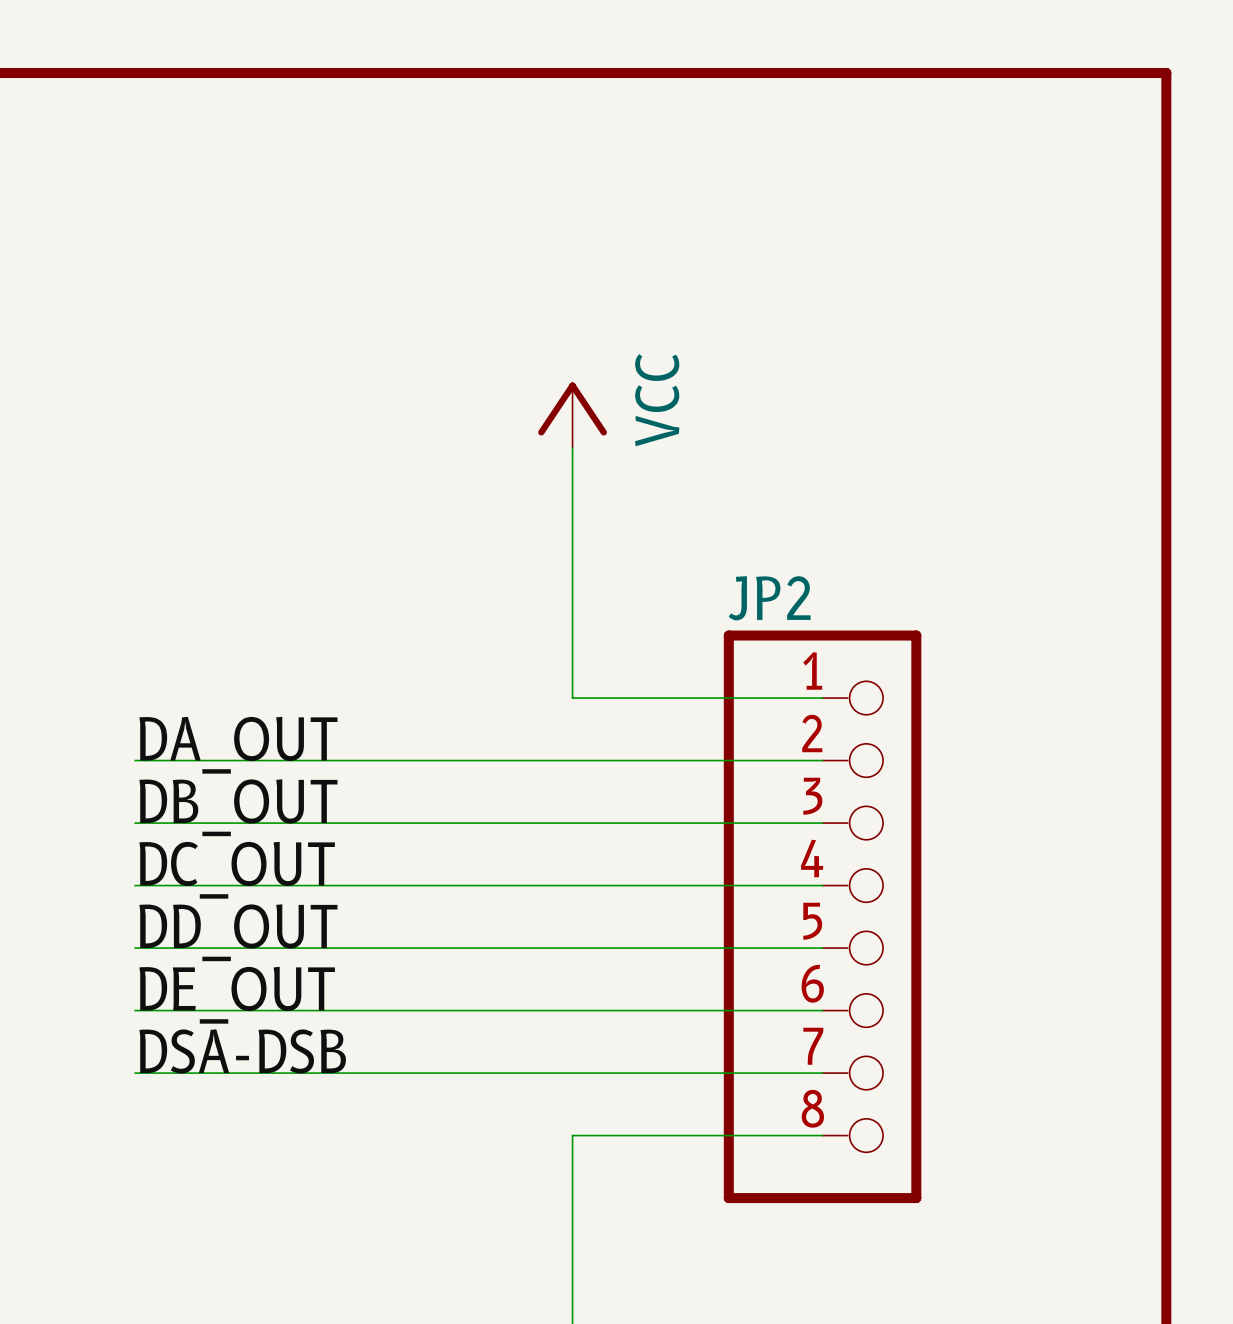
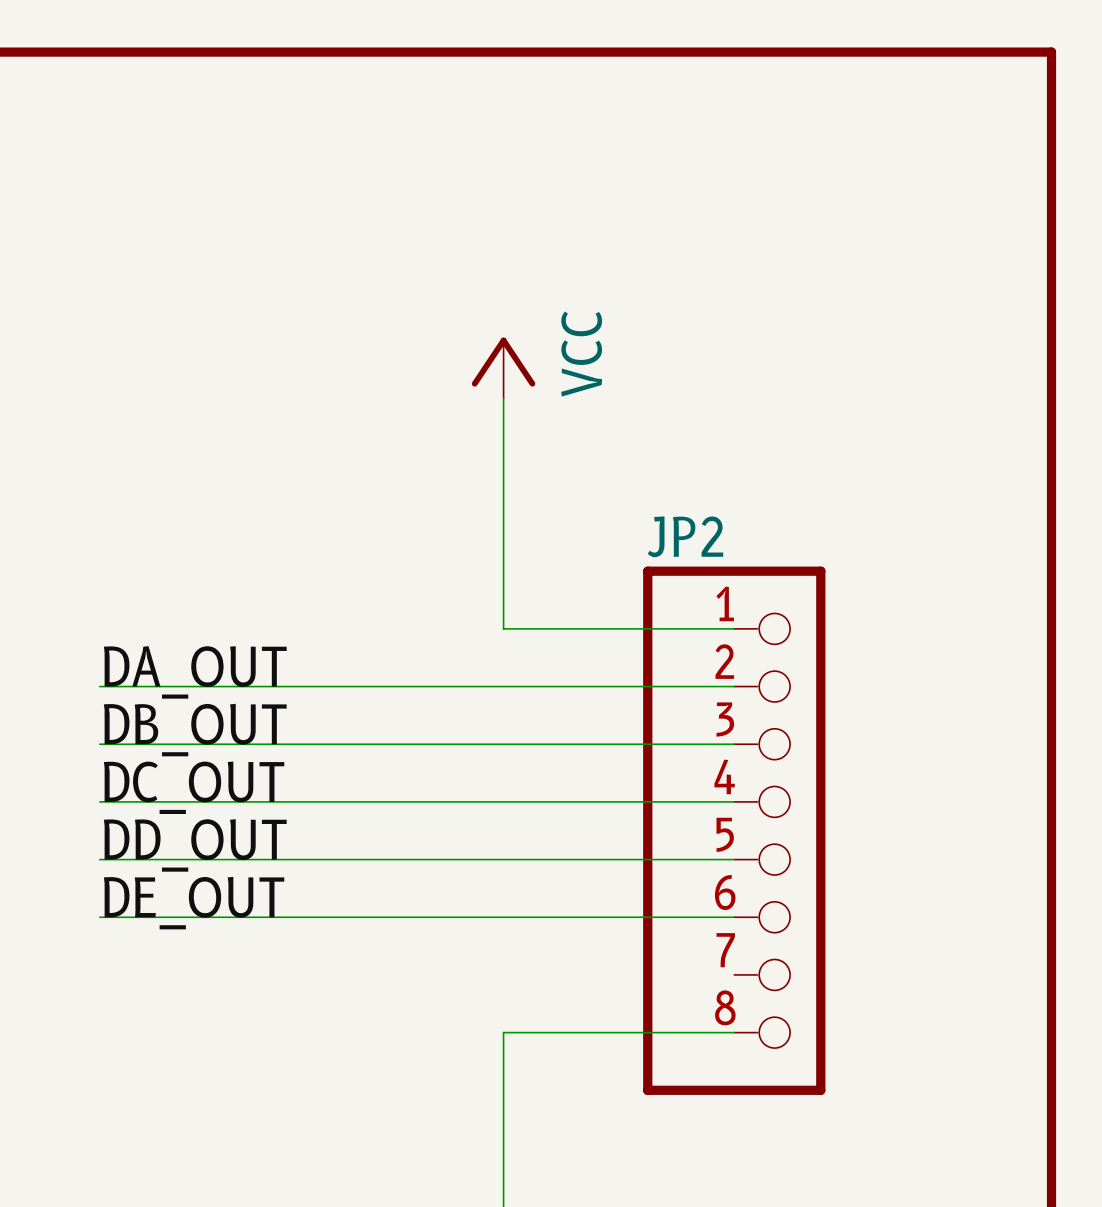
label: DSA-DSB (242, 1051) -> none
wire: (135, 1073) (822, 1073) -> none

